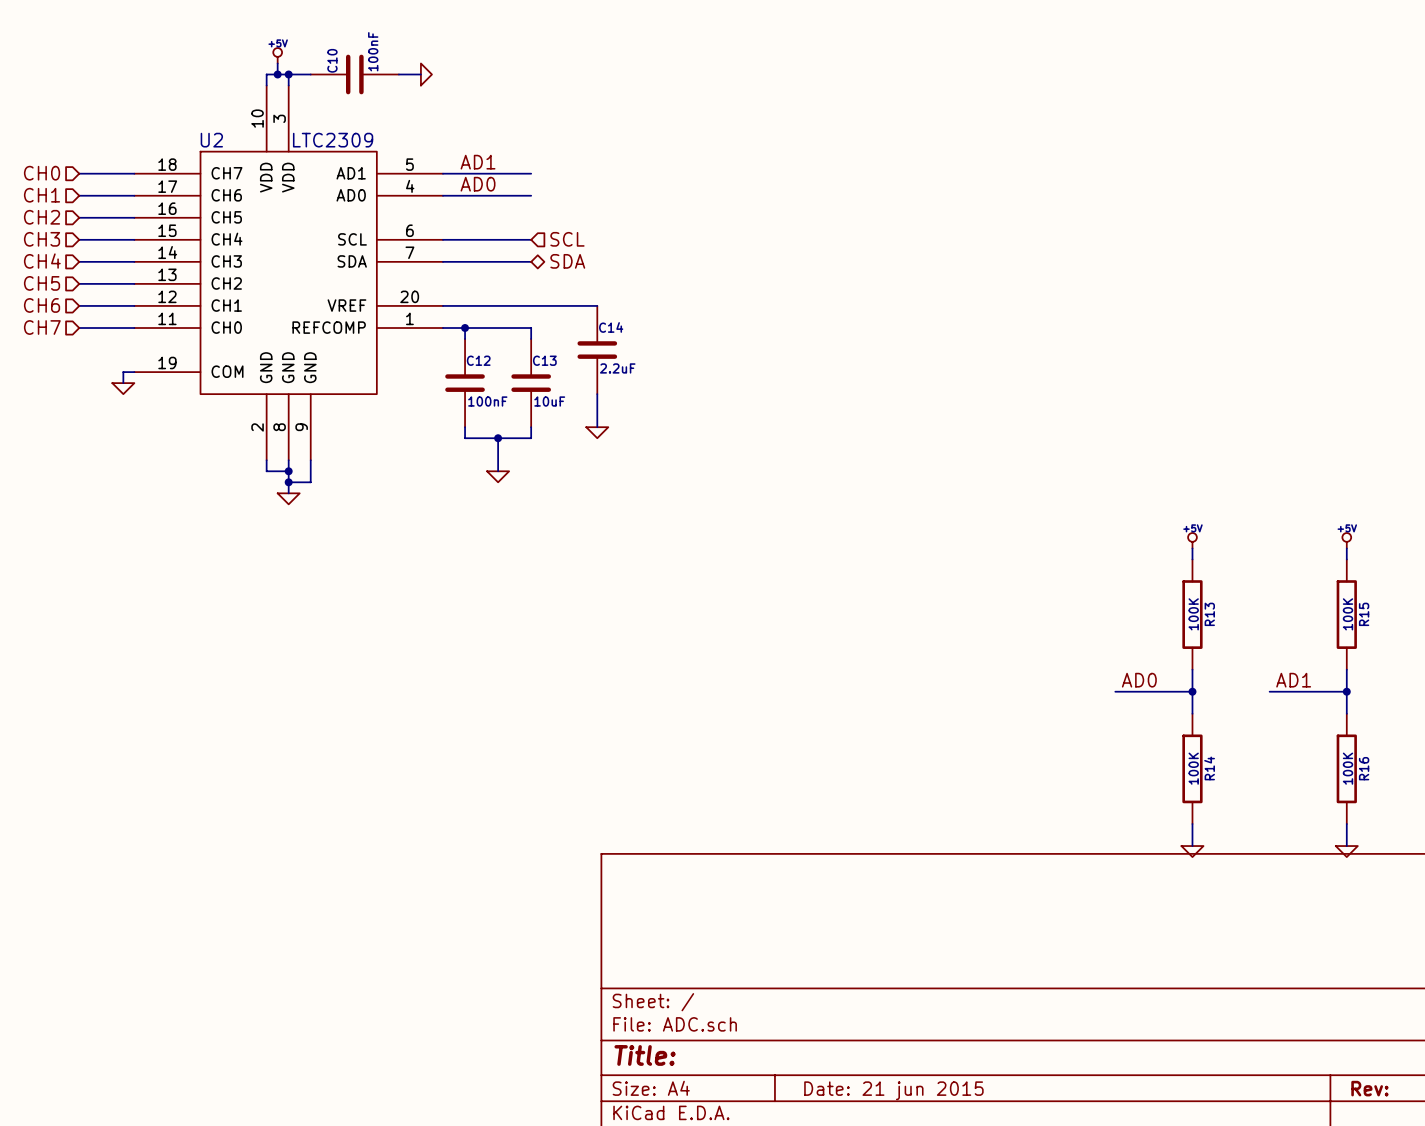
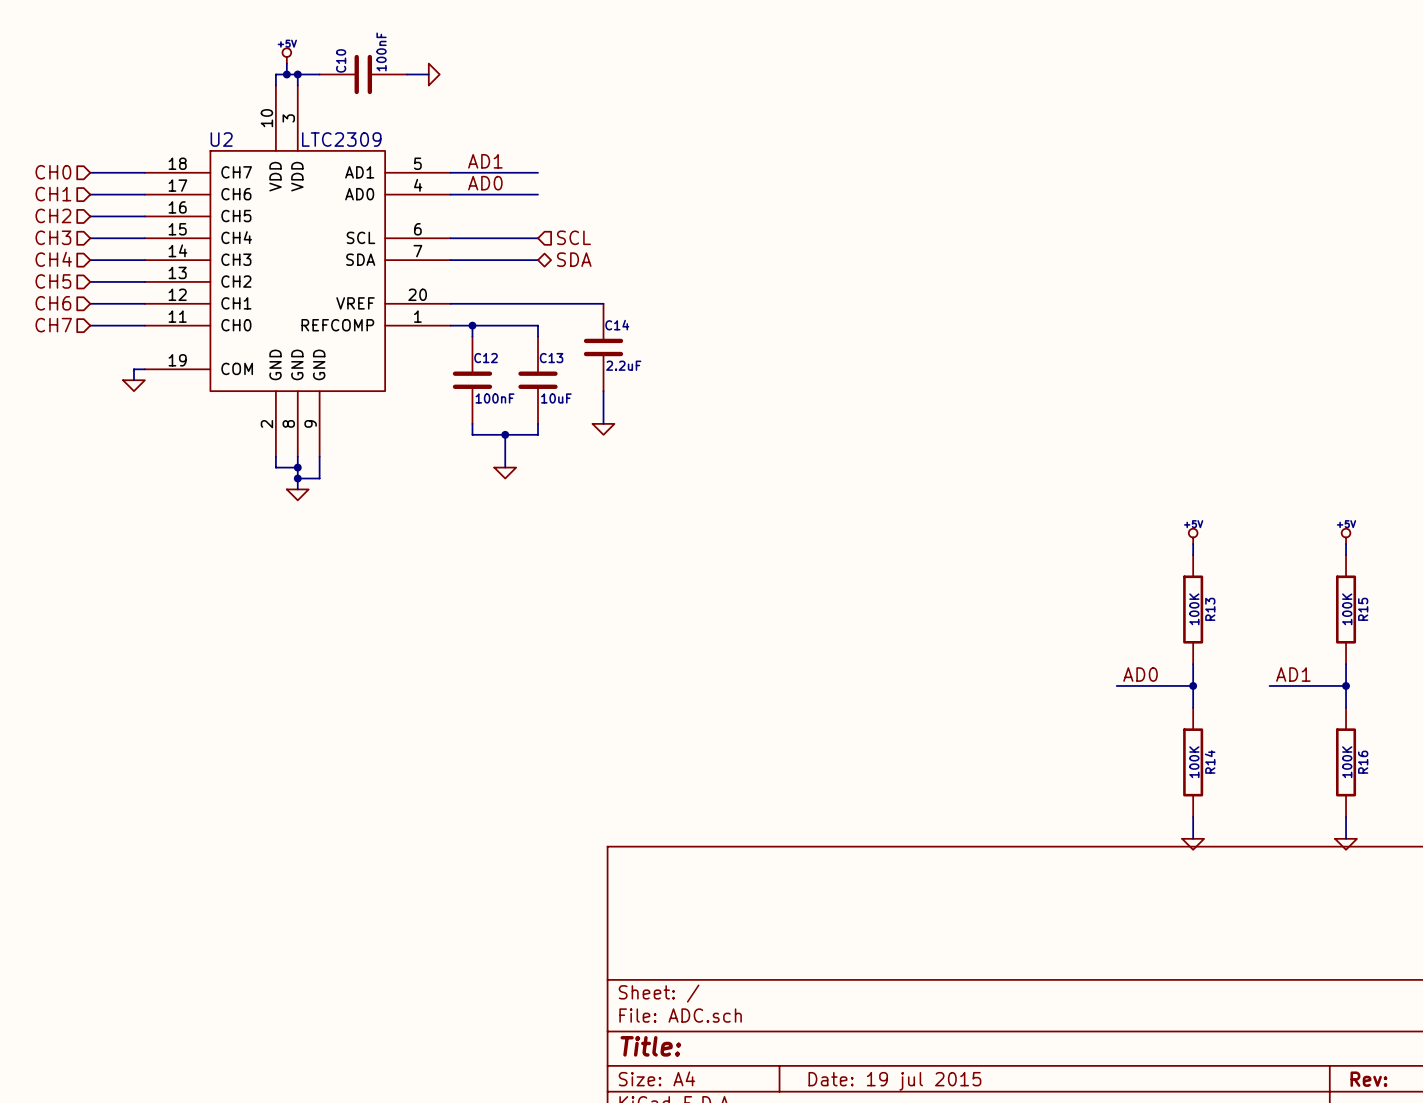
title block: Date: 21 jun 2015 (893, 1090) -> Date: 19 jul 2015 (894, 1081)

